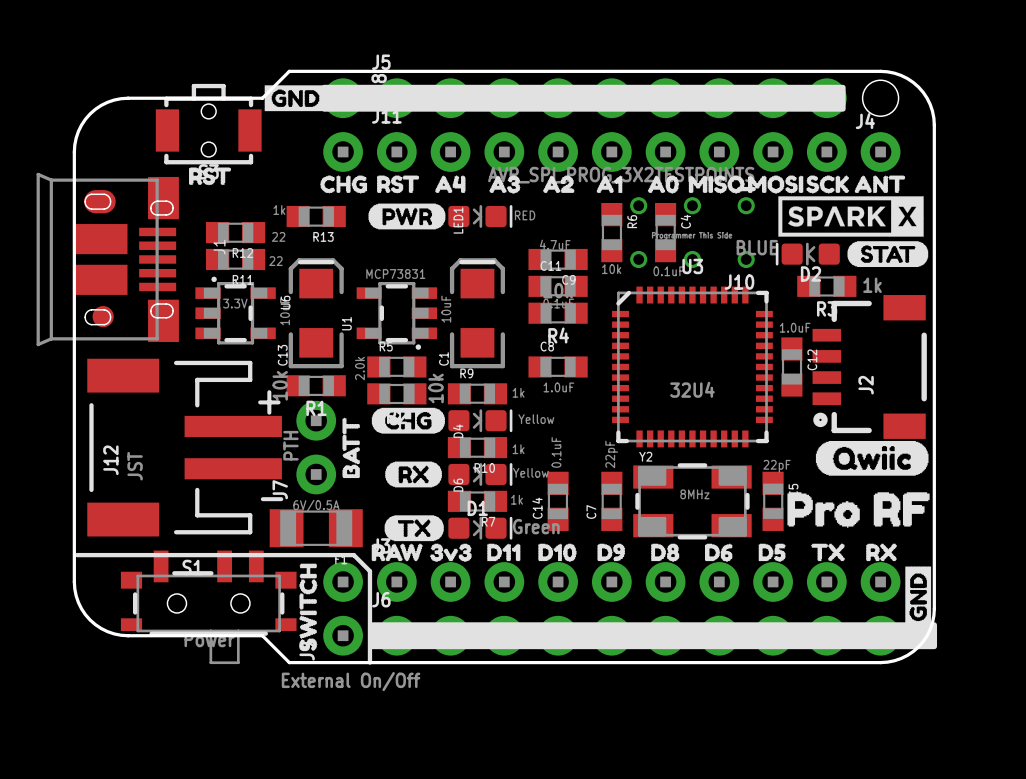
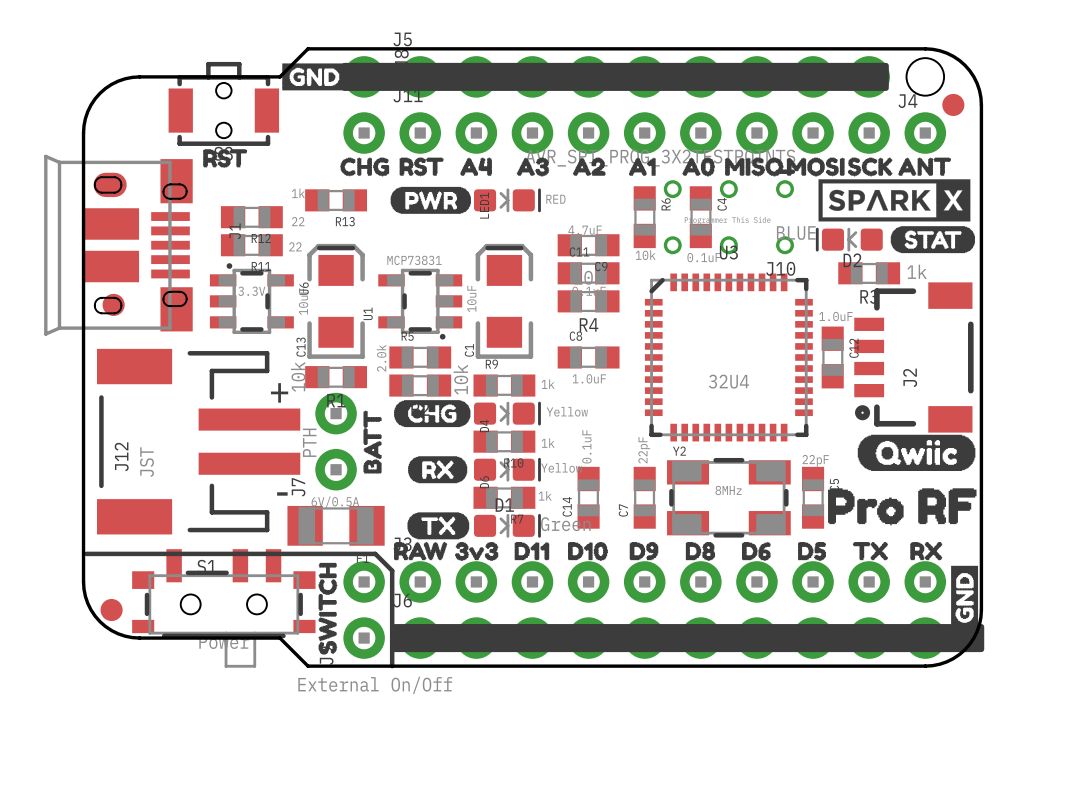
part: none -> (953, 104)
part: none -> (111, 610)

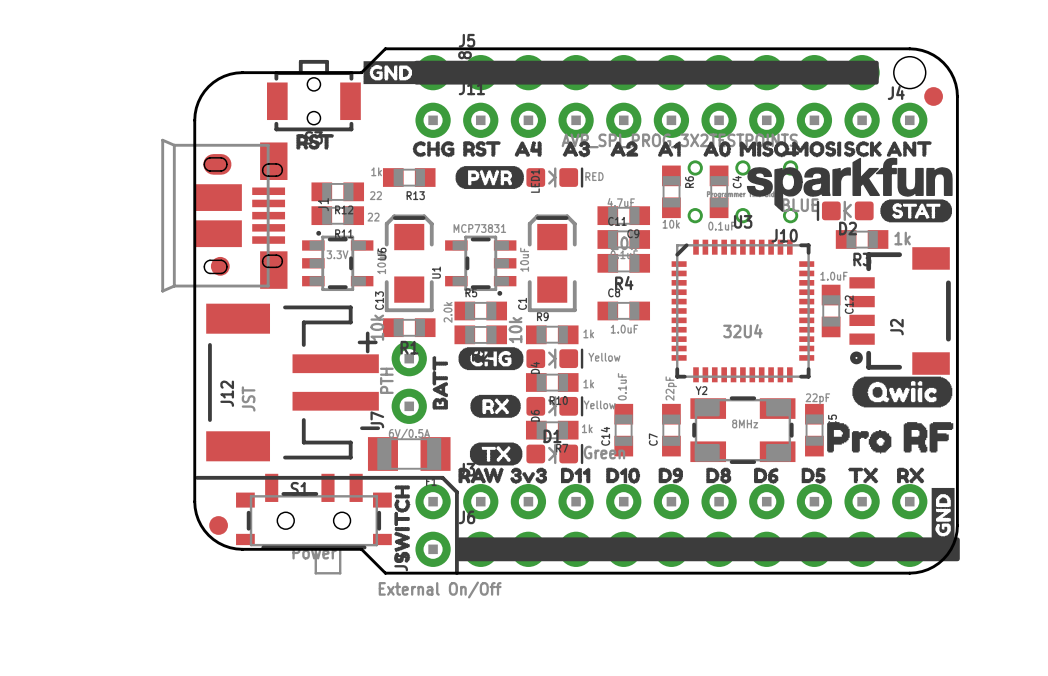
drawing: none -> [746, 157, 953, 212]
drawing: [818, 179, 971, 222] -> none

